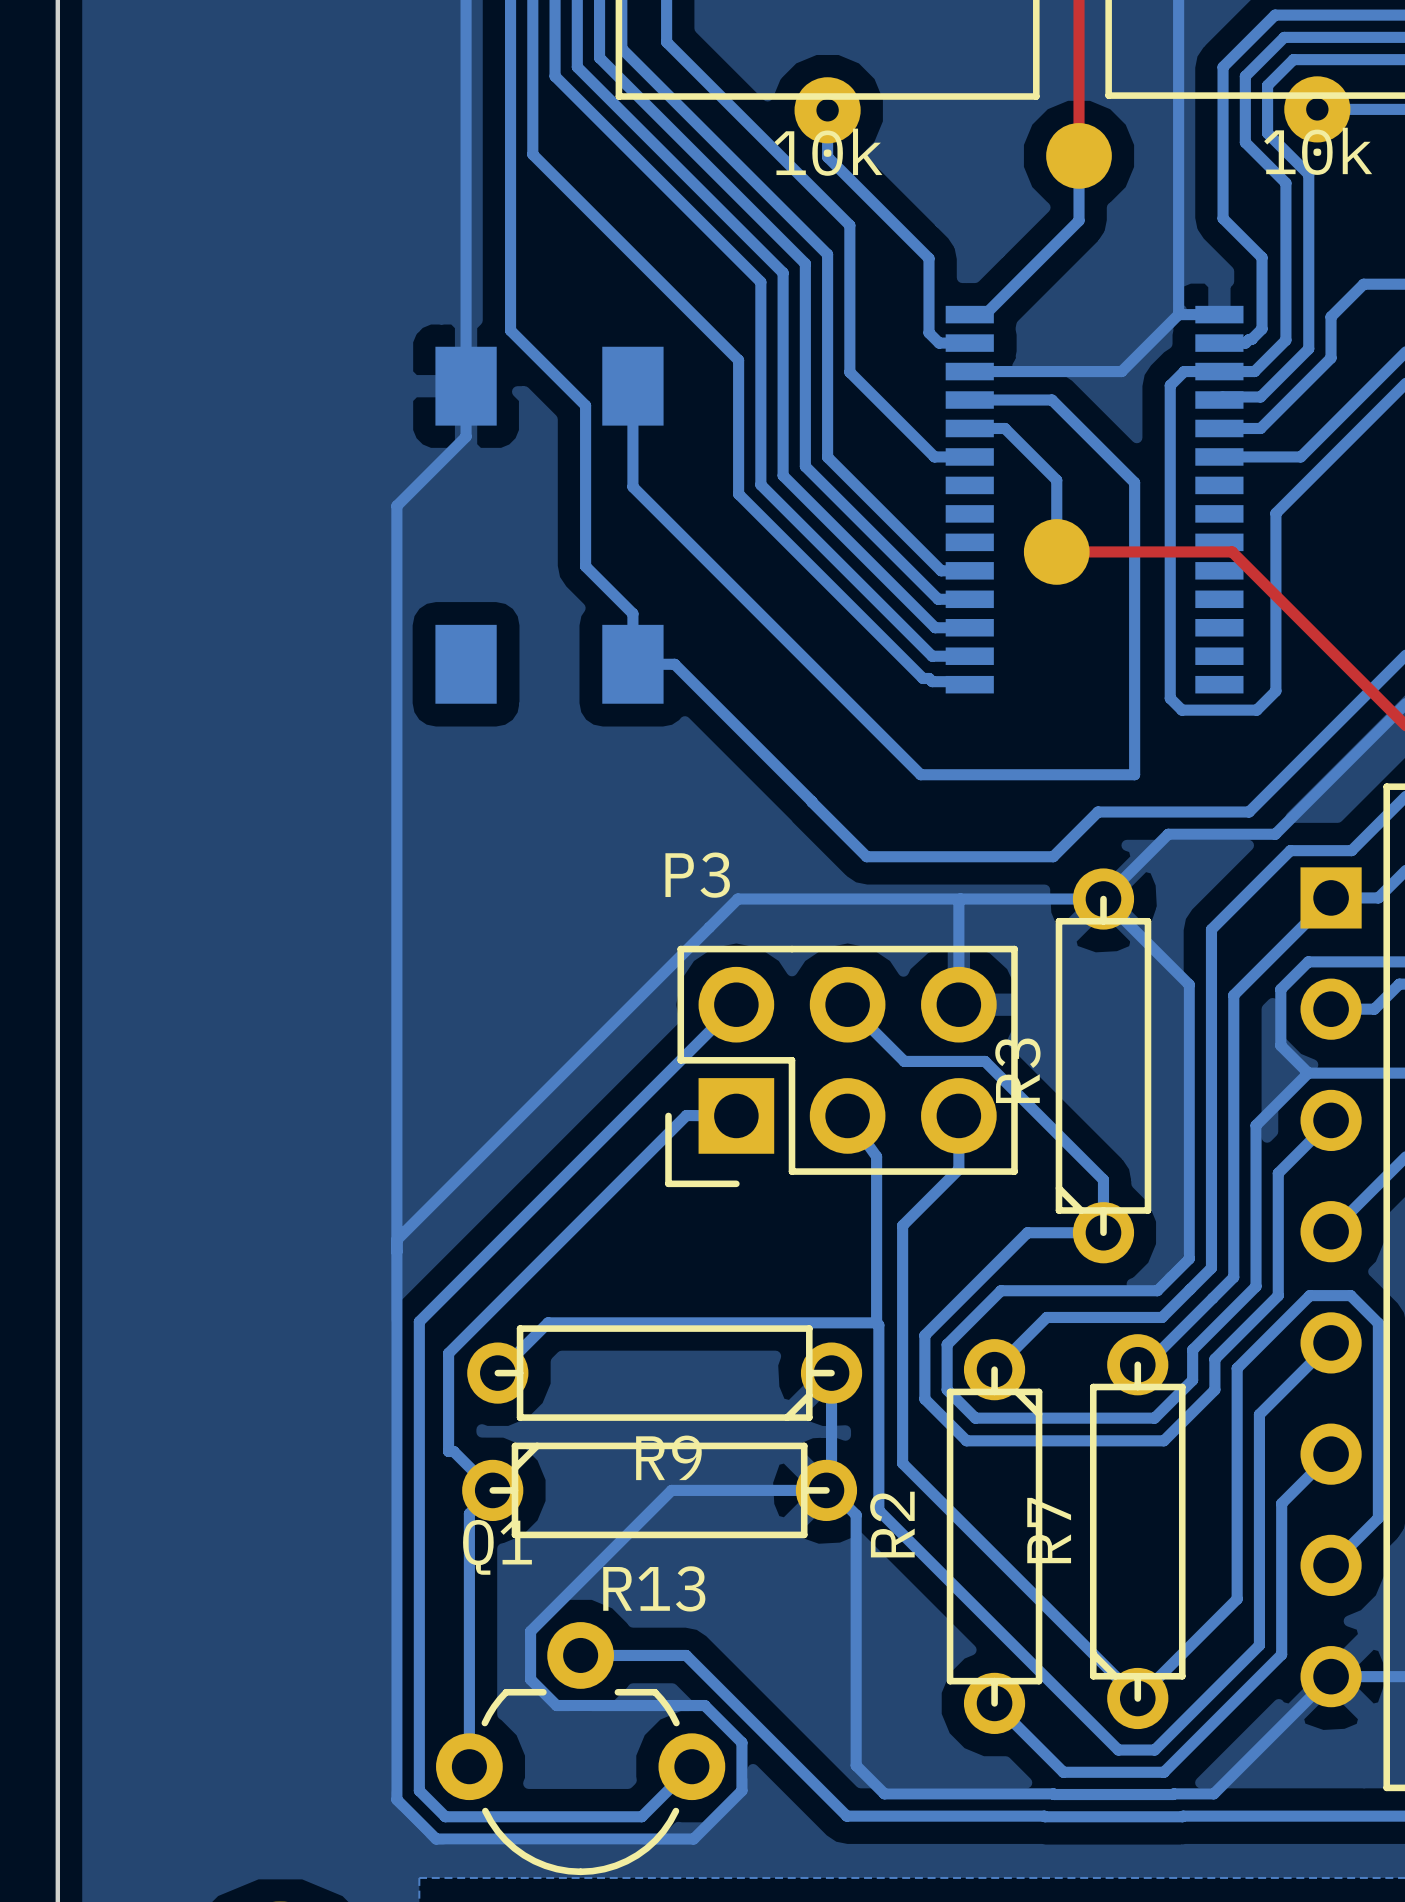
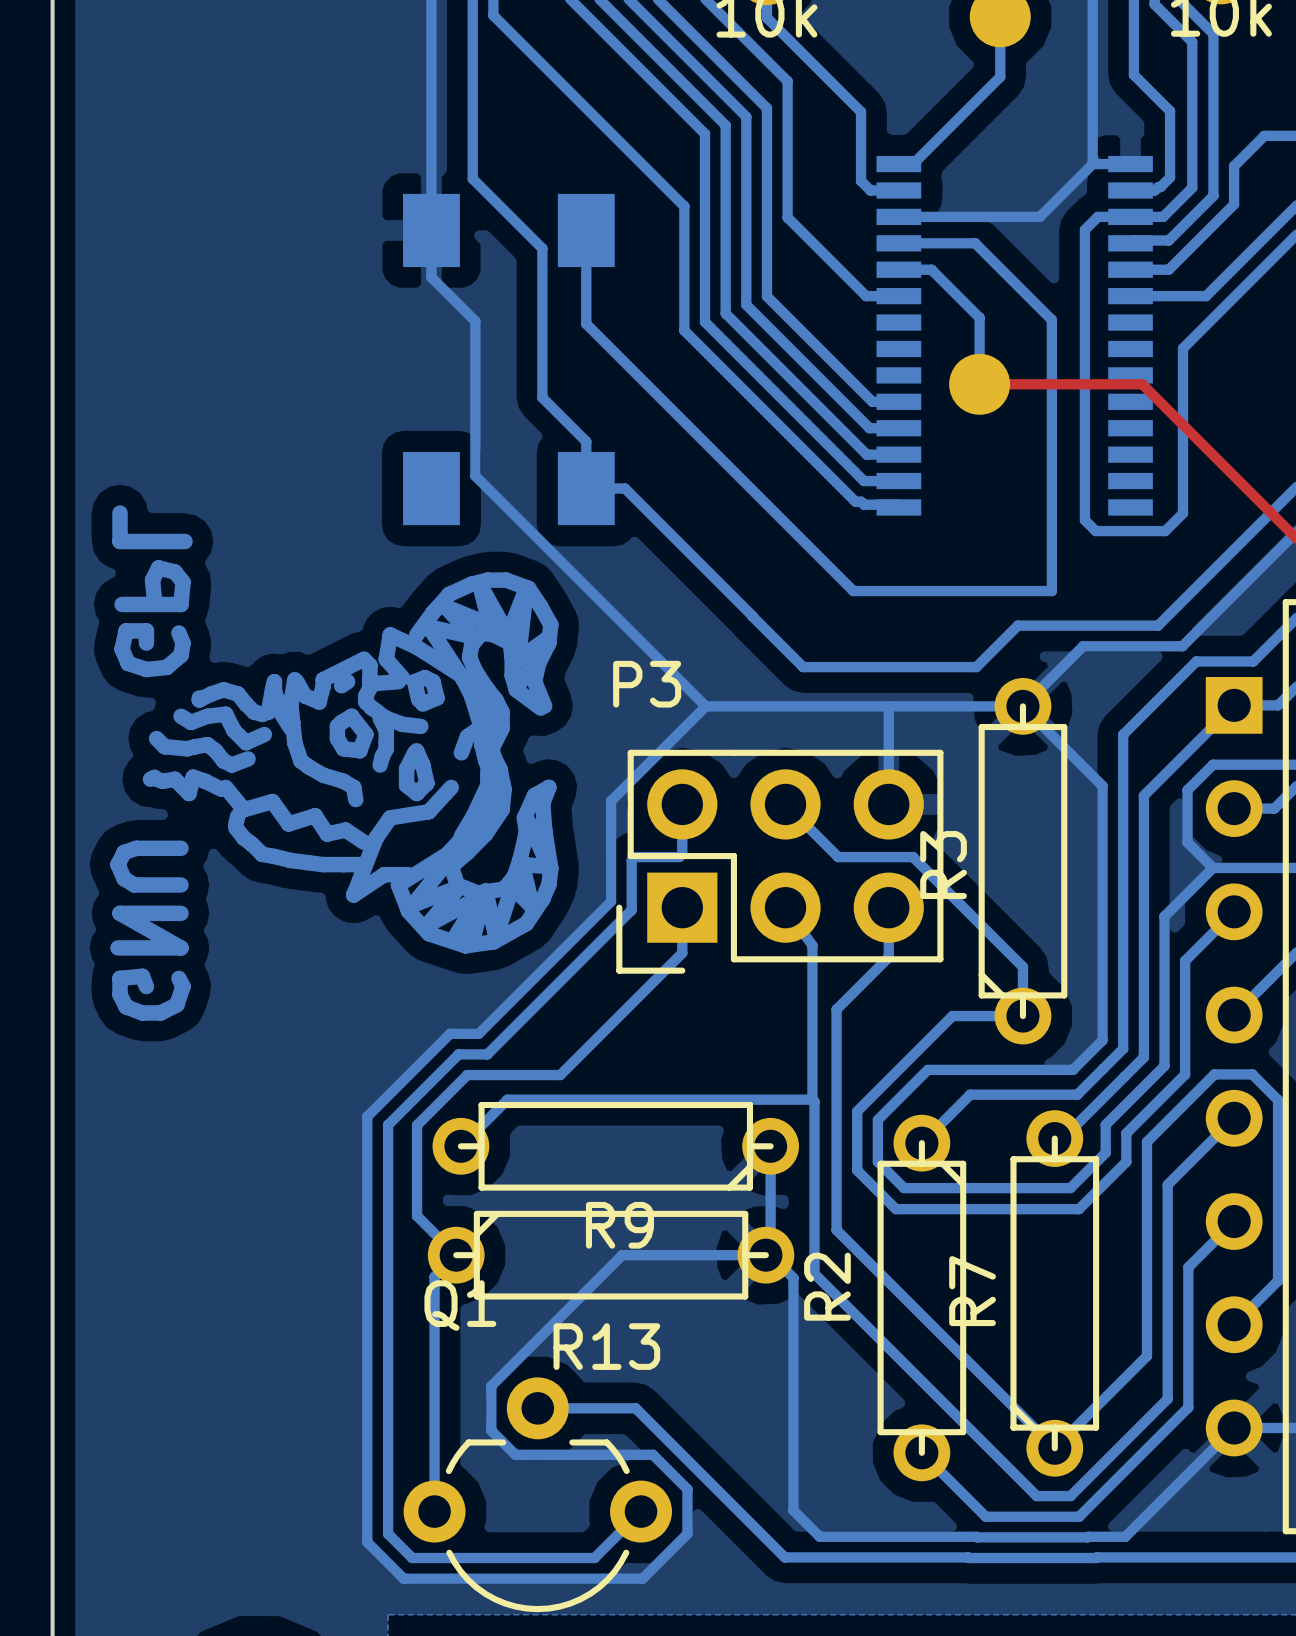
bottom track: (466, 436) (396, 505) (396, 1341) -> (431, 277) (475, 321) (475, 475) (705, 706) (611, 801) (611, 901) (478, 1033) (450, 1033) (367, 1116)
drawing: none -> [110, 505, 559, 1021]
bottom track: (761, 899) (737, 899) (396, 1239) -> none
bottom track: (736, 1004) (419, 1321) (419, 1350) -> (682, 804) (682, 854) (679, 857) (634, 857) (631, 860) (631, 910) (487, 1054) (458, 1054) (388, 1124)
bottom track: (736, 1115) (686, 1115) (448, 1353) (448, 1451) (453, 1451) (492, 1490) -> (682, 907) (682, 953) (560, 1075) (467, 1075) (417, 1125) (417, 1216) (456, 1255)

